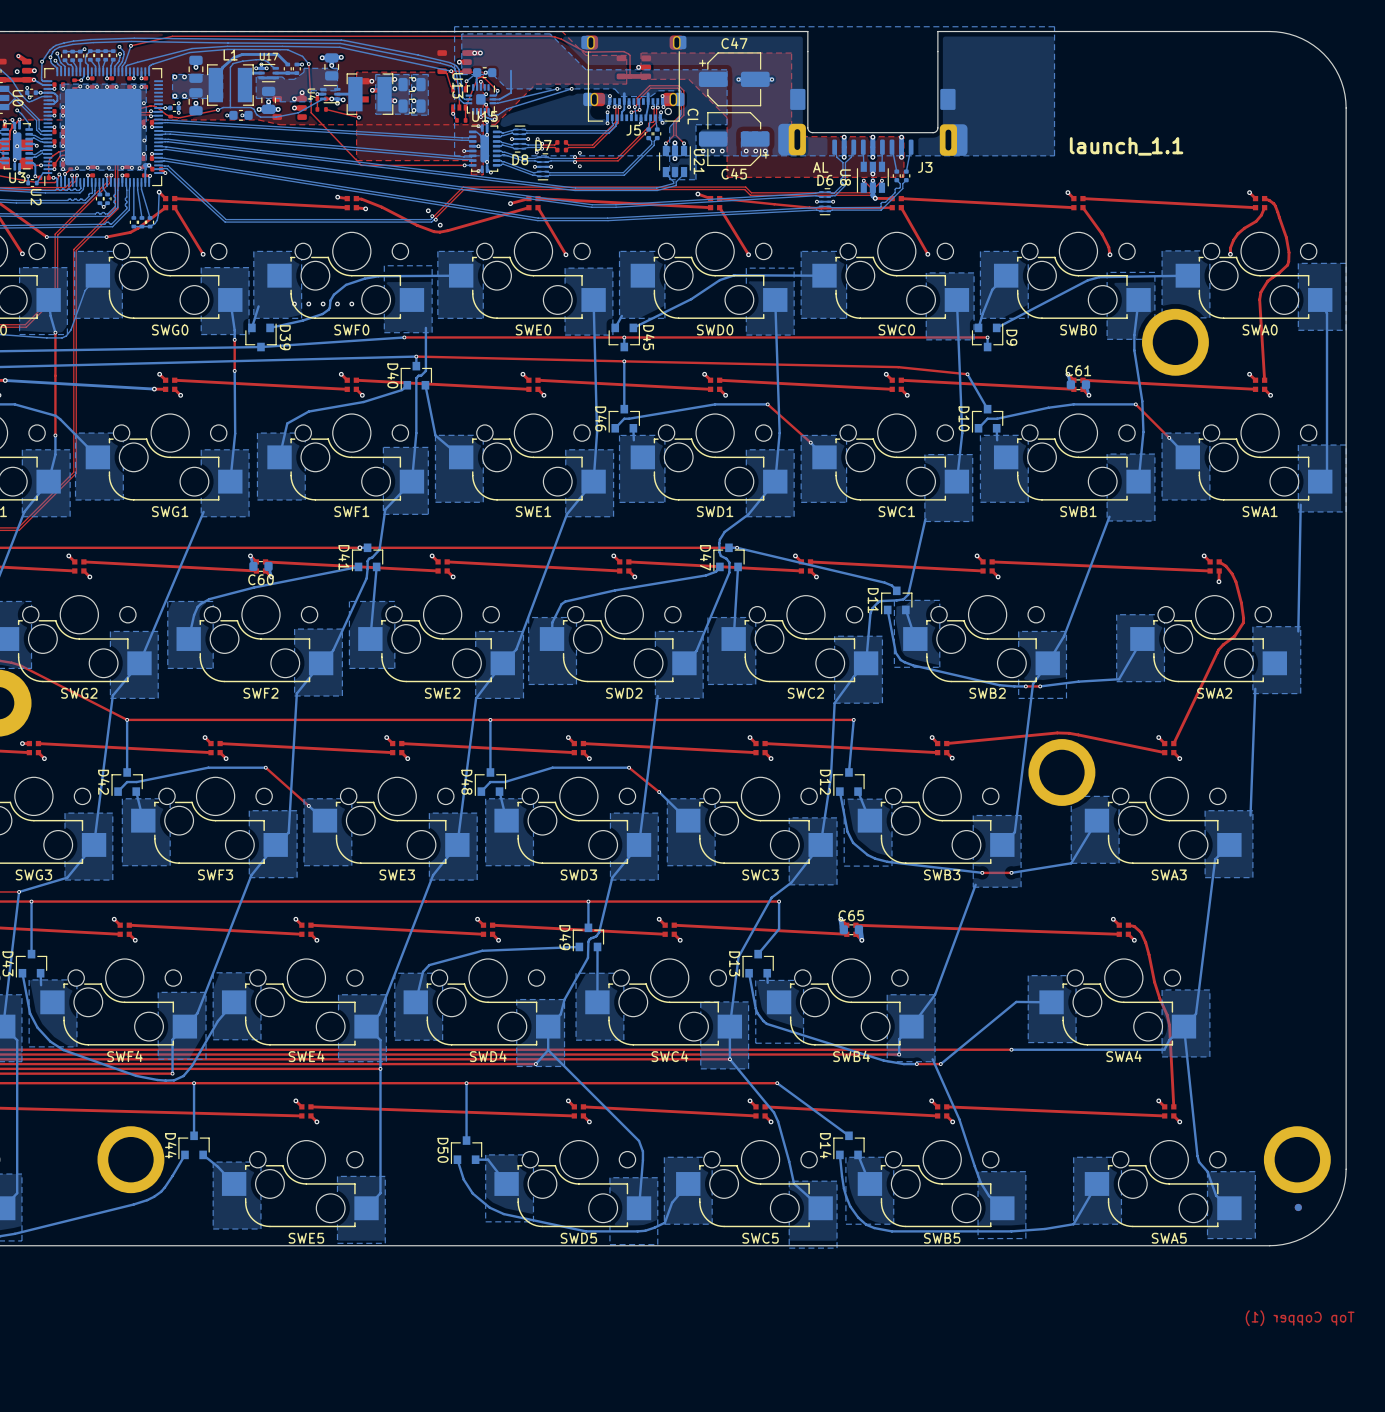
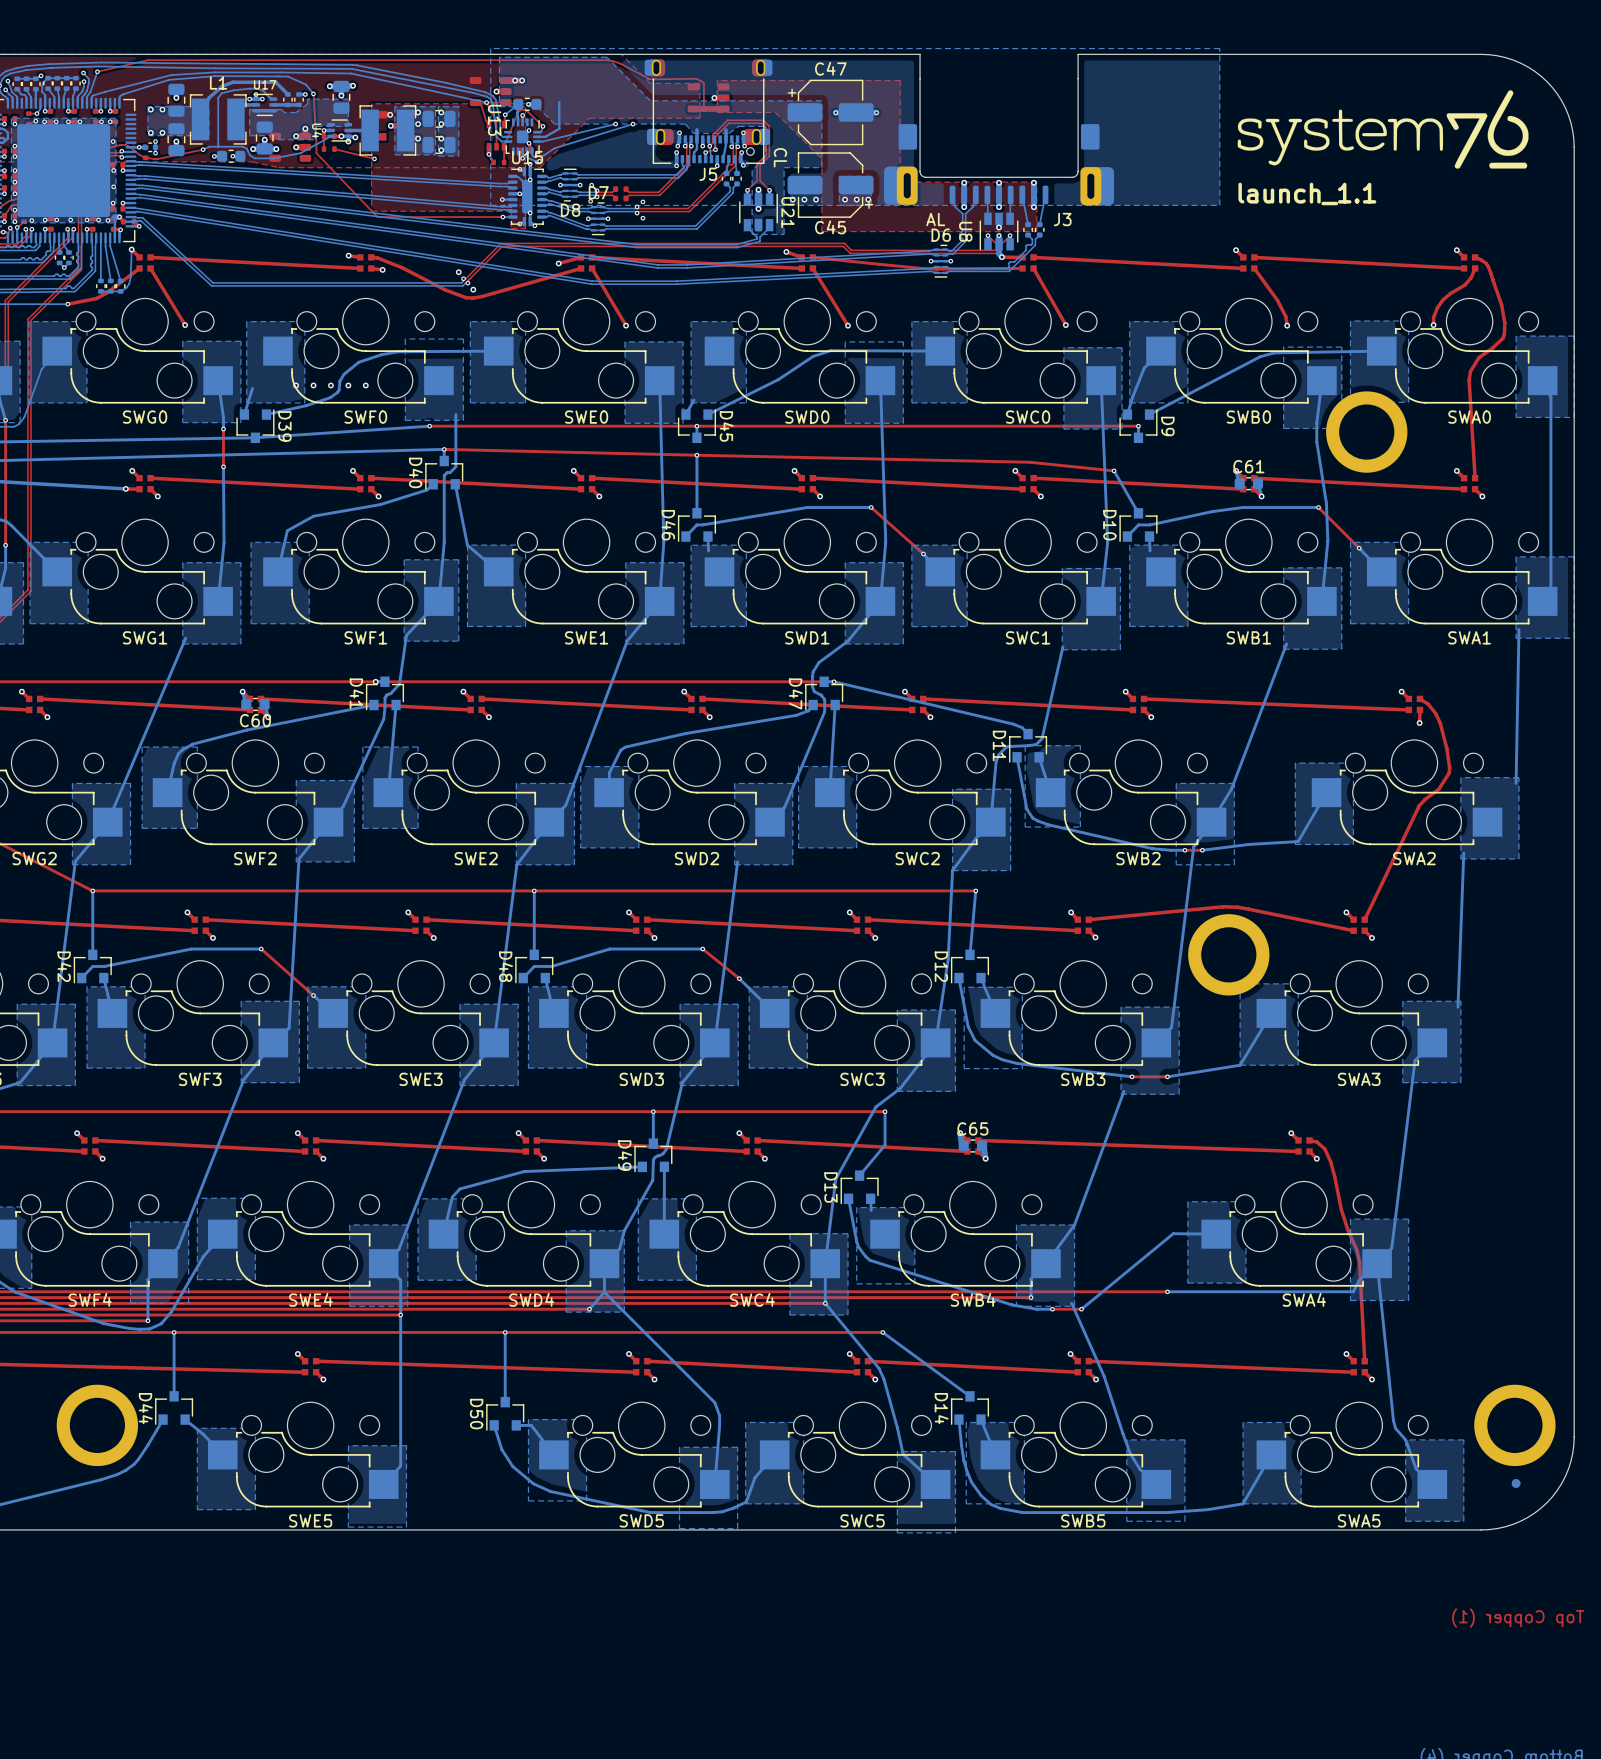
drawing: none -> [1237, 90, 1529, 169]

